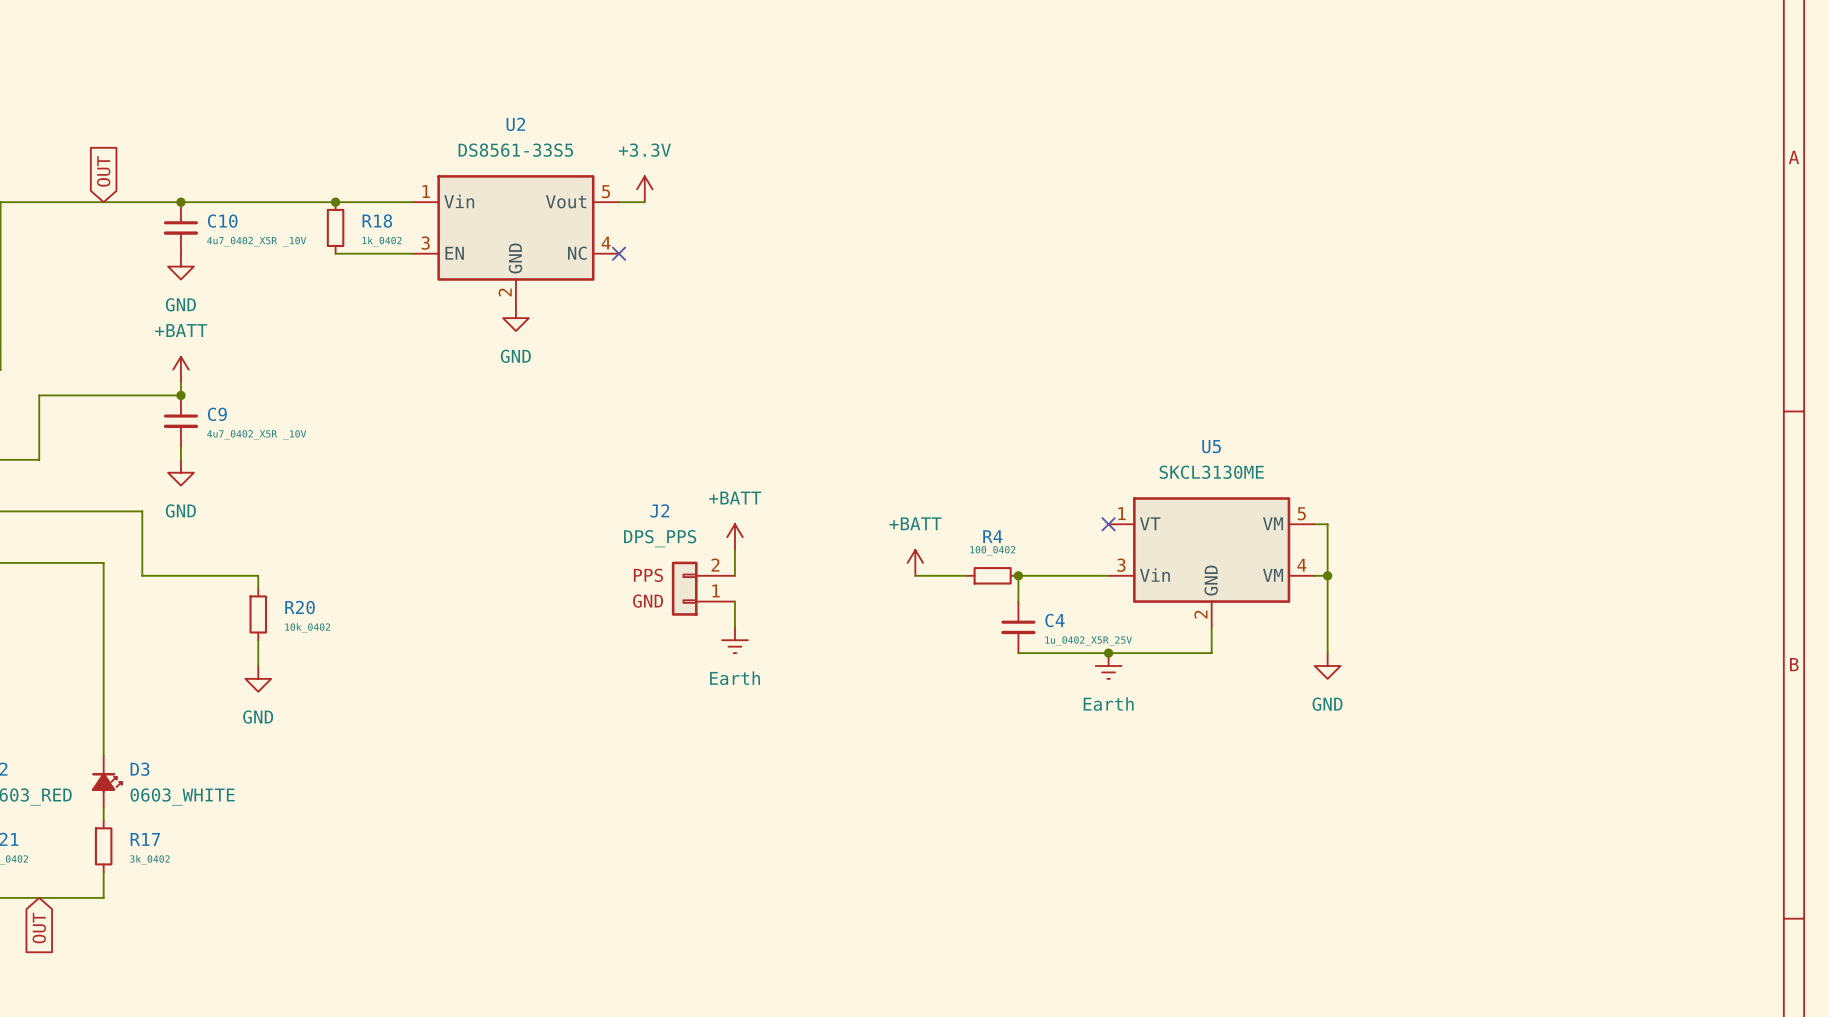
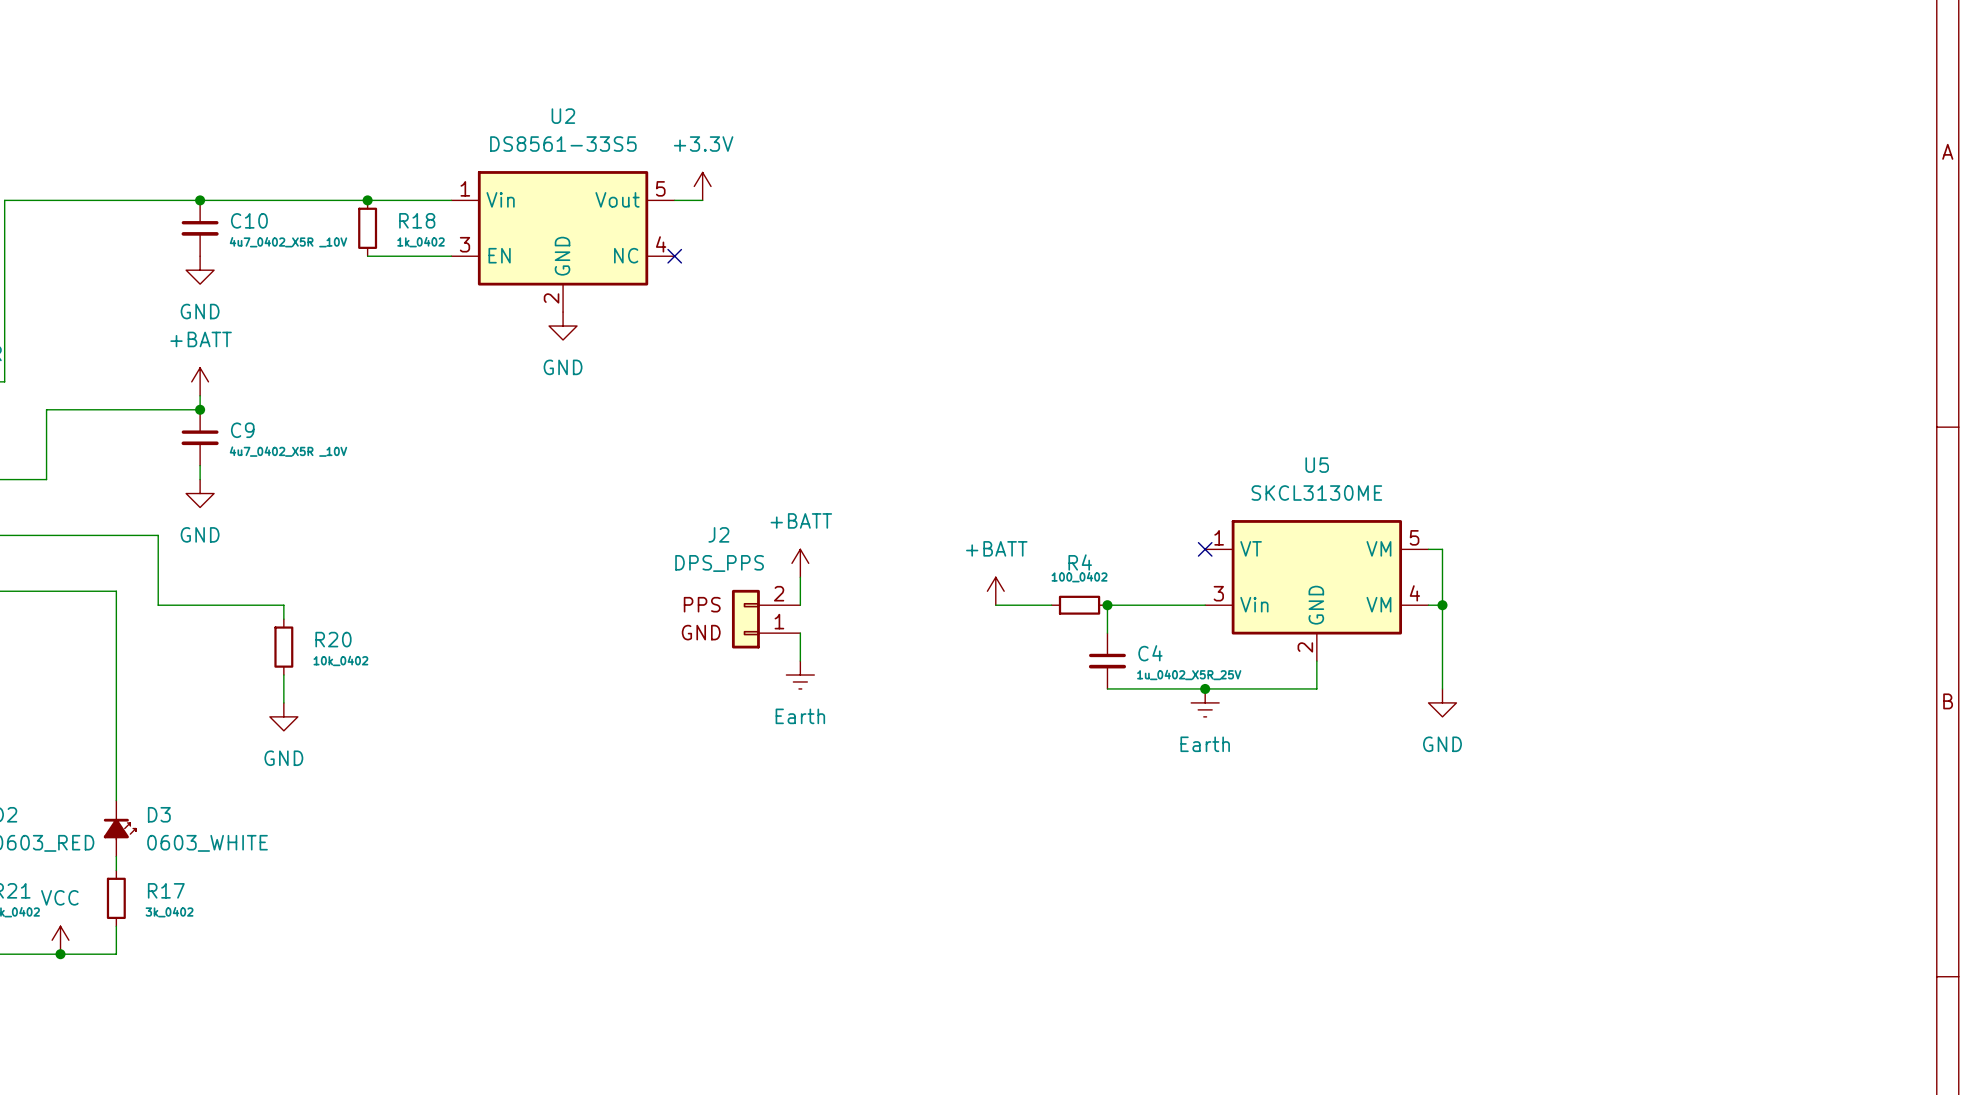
global label: OUT (103, 171) -> none
power symbol: none -> VCC (60, 940)
junction: none -> (60, 954)
global label: OUT (39, 928) -> none

